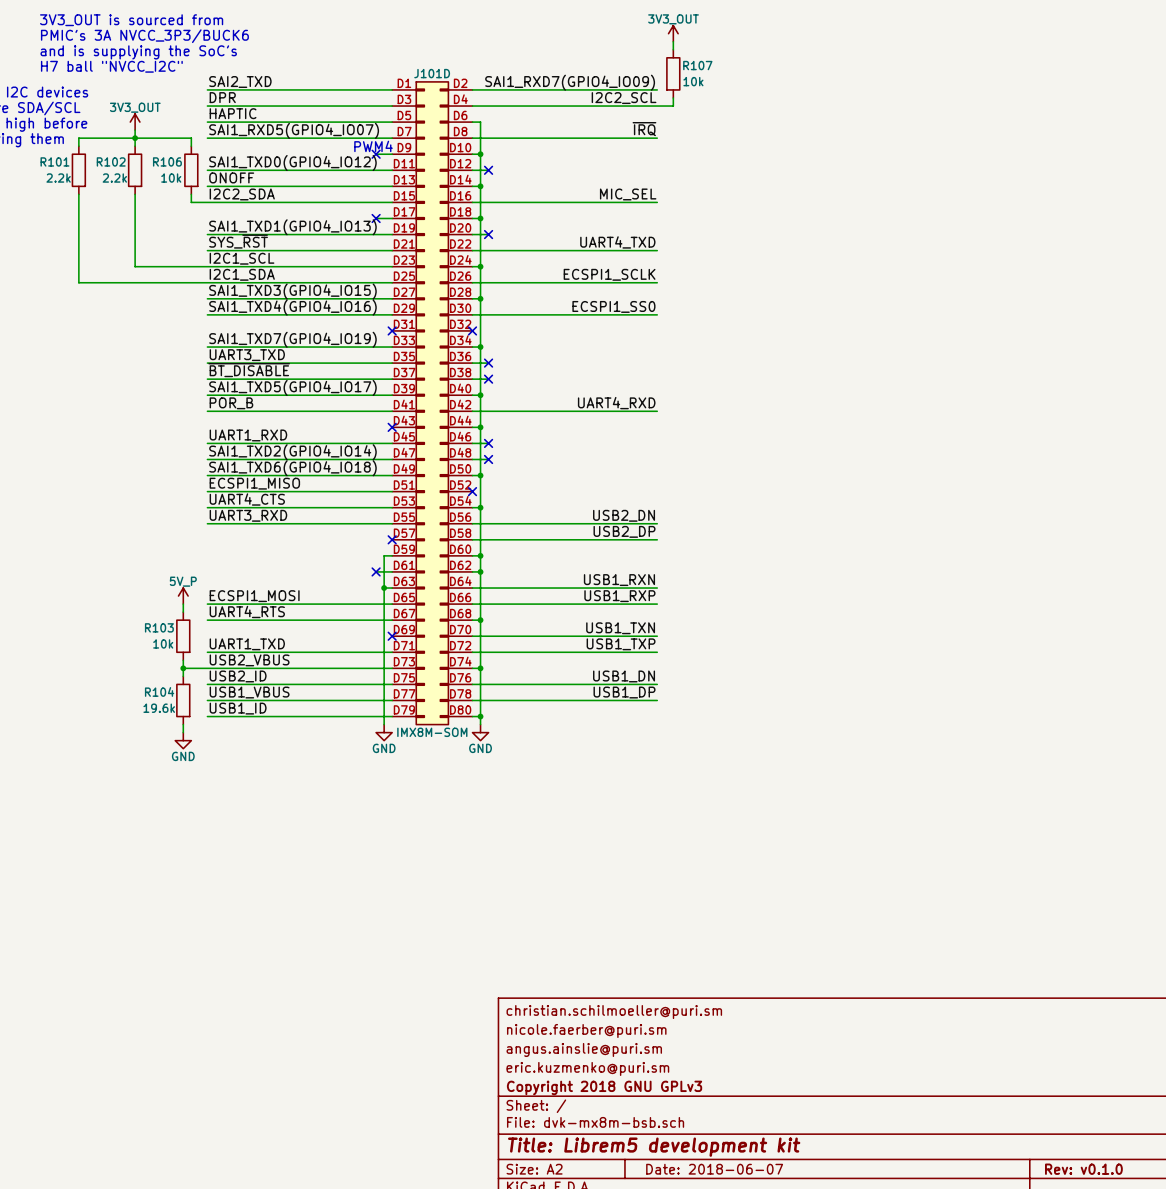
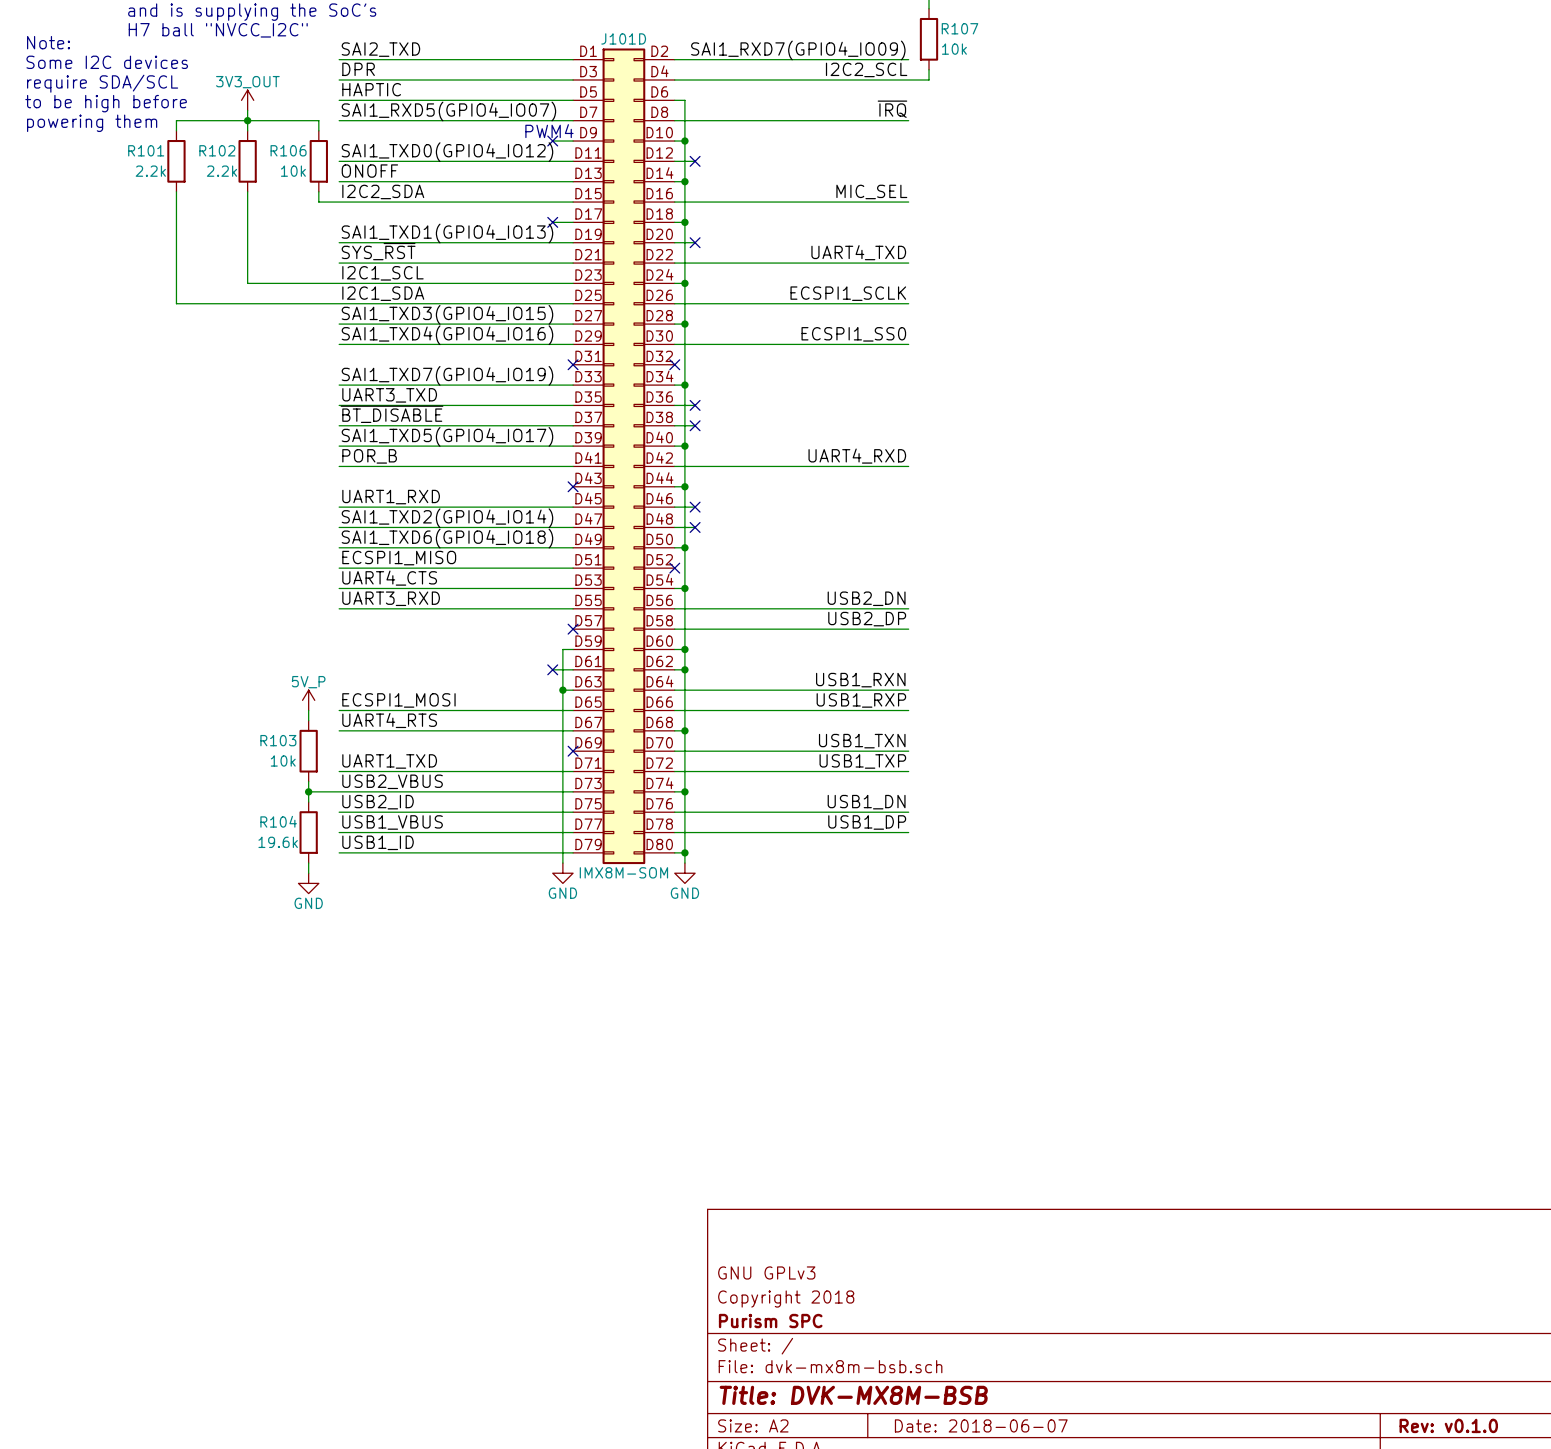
title block: christian.schilmoeller@puri.sm (614, 1012) -> none
title block: nicole.faerber@puri.sm (586, 1031) -> none
title block: angus.ainslie@puri.sm (584, 1049) -> GNU GPLv3 (766, 1272)
title block: eric.kuzmenko@puri.sm (587, 1068) -> Copyright 2018 (786, 1299)
title block: Copyright 2018 GNU GPLv3 (604, 1087) -> Purism SPC (770, 1321)
title block: Title: Librem5 development kit (654, 1147) -> Title: DVK-MX8M-BSB (853, 1395)

